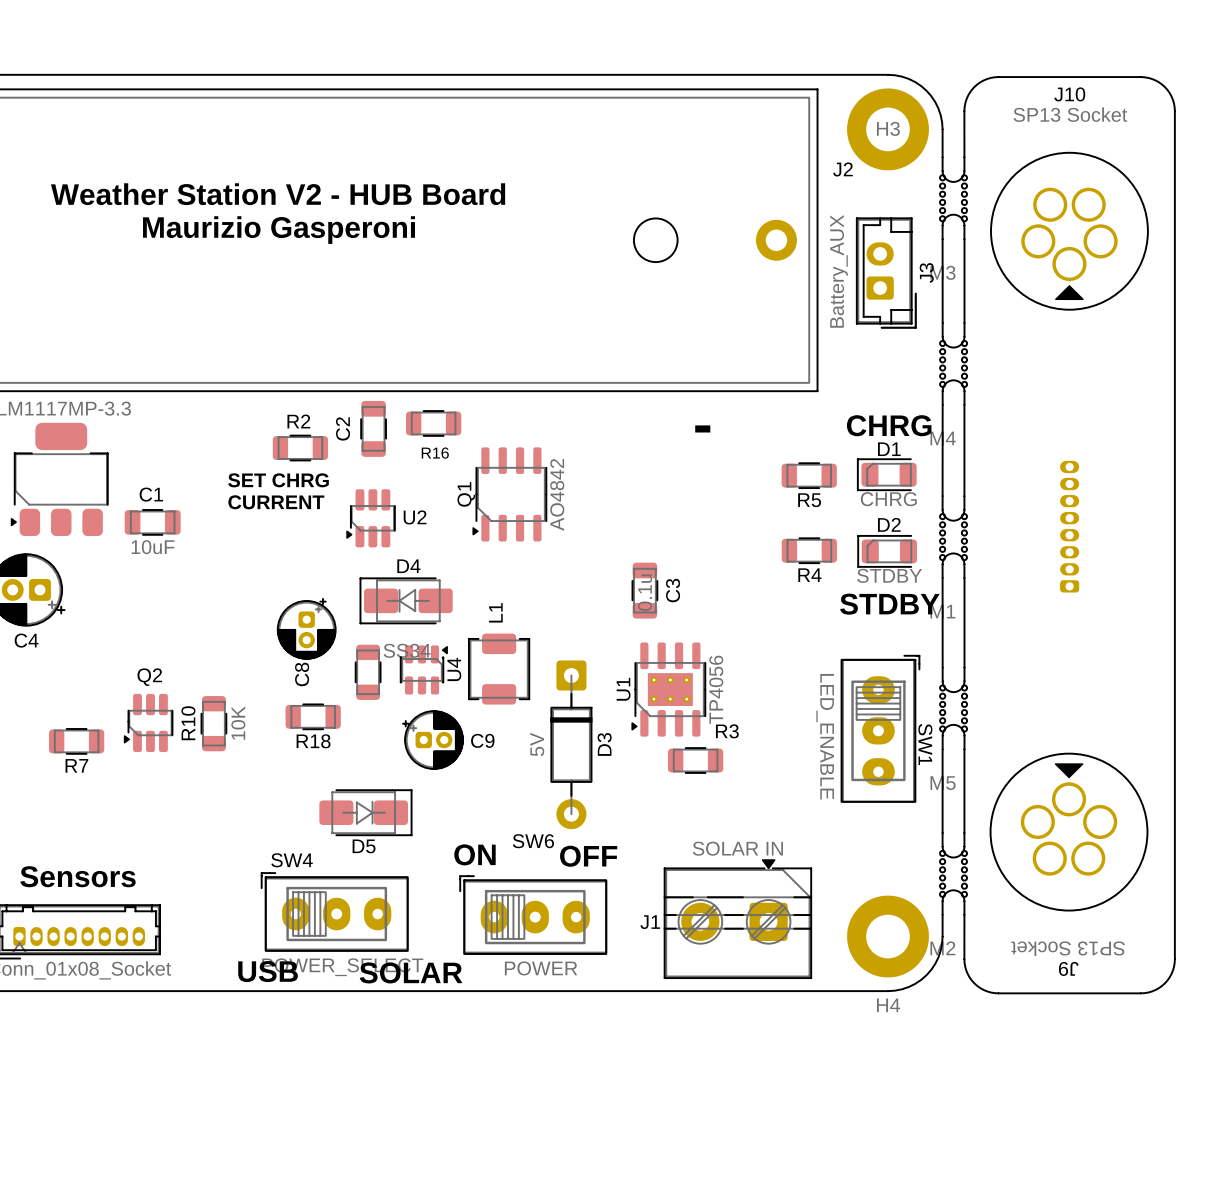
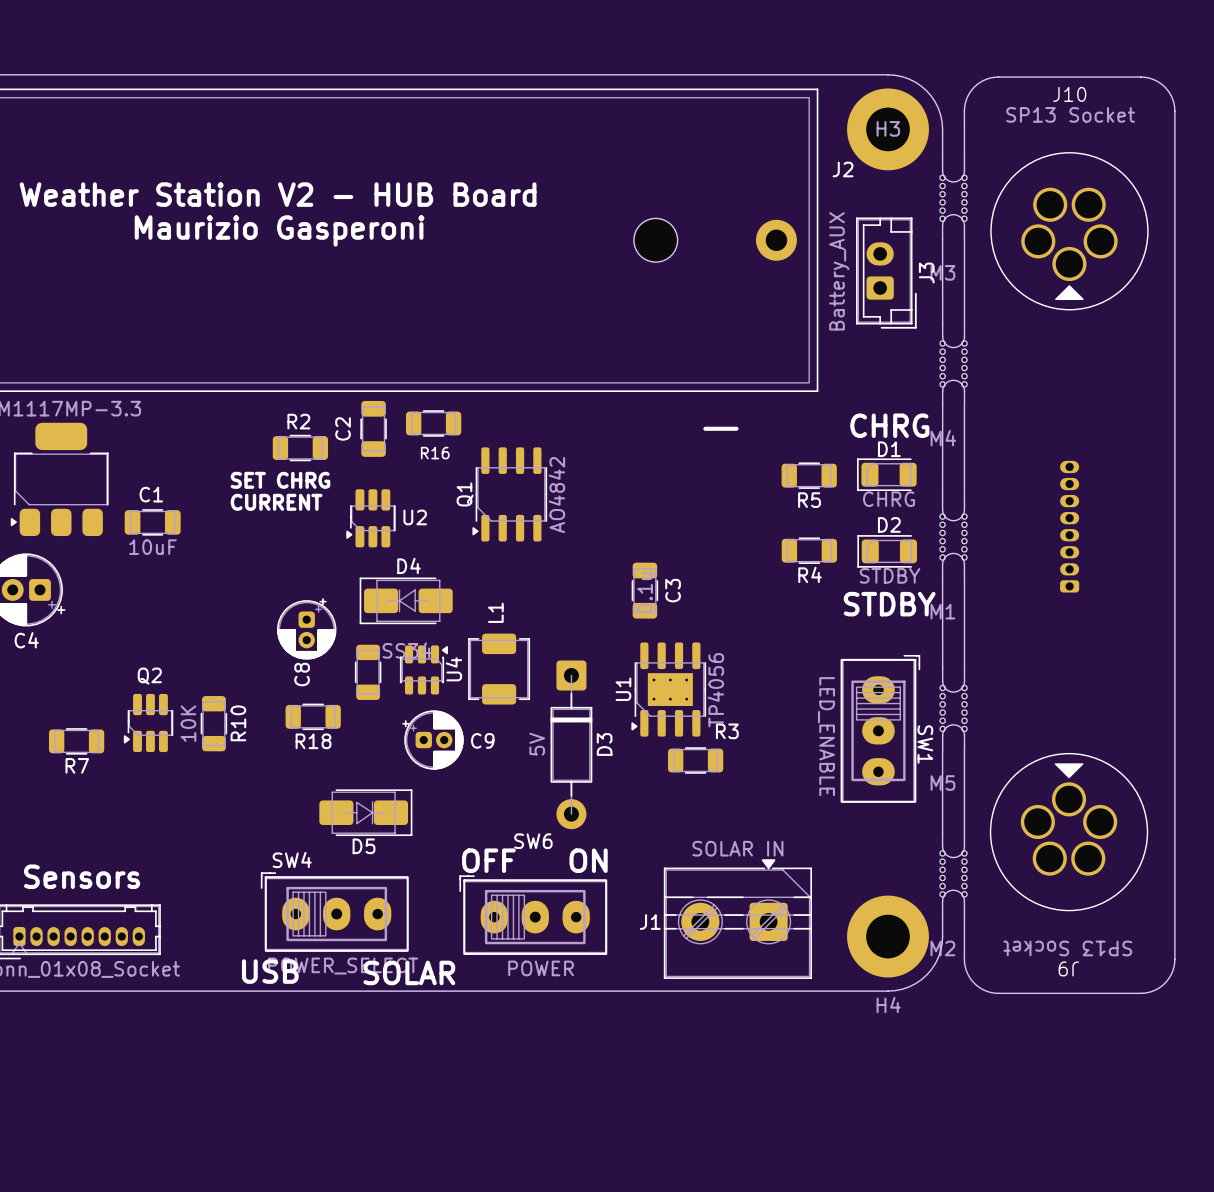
R10 name position: R10 (188, 723) -> R10 (238, 723)
R10 value position: 10K (238, 723) -> 10K (188, 723)
text: ON (474, 854) -> OFF (488, 860)
text: OFF (588, 856) -> ON (588, 860)

